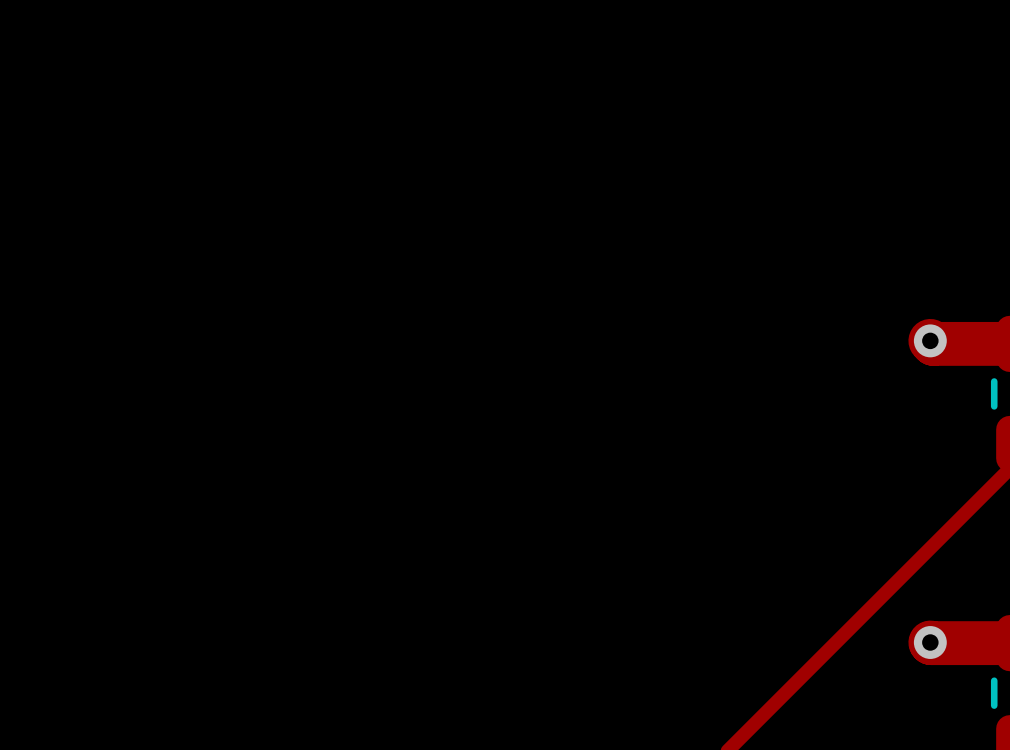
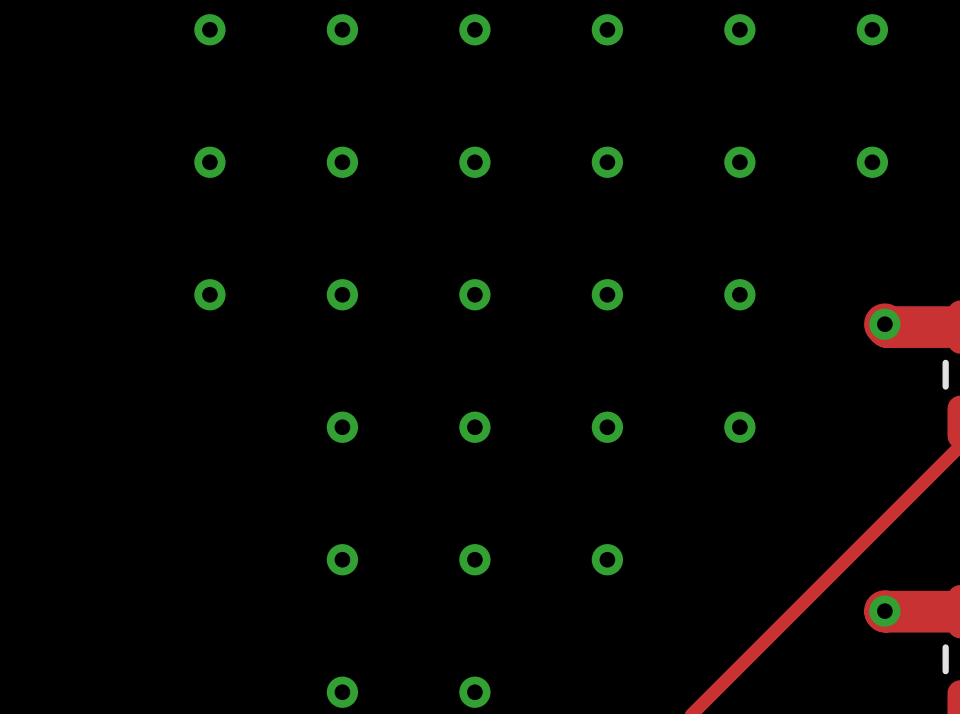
via: none -> (209, 29)
via: none -> (342, 29)
via: none -> (474, 29)
via: none -> (607, 29)
via: none -> (739, 29)
via: none -> (872, 29)
via: none -> (209, 162)
via: none -> (342, 162)
via: none -> (474, 162)
via: none -> (607, 162)
via: none -> (739, 162)
via: none -> (872, 162)
via: none -> (209, 294)
via: none -> (342, 294)
via: none -> (474, 294)
via: none -> (607, 294)
via: none -> (739, 294)
via: none -> (342, 427)
via: none -> (474, 427)
via: none -> (607, 427)
via: none -> (739, 427)
via: none -> (342, 559)
via: none -> (474, 559)
via: none -> (607, 559)
via: none -> (342, 692)
via: none -> (474, 692)

